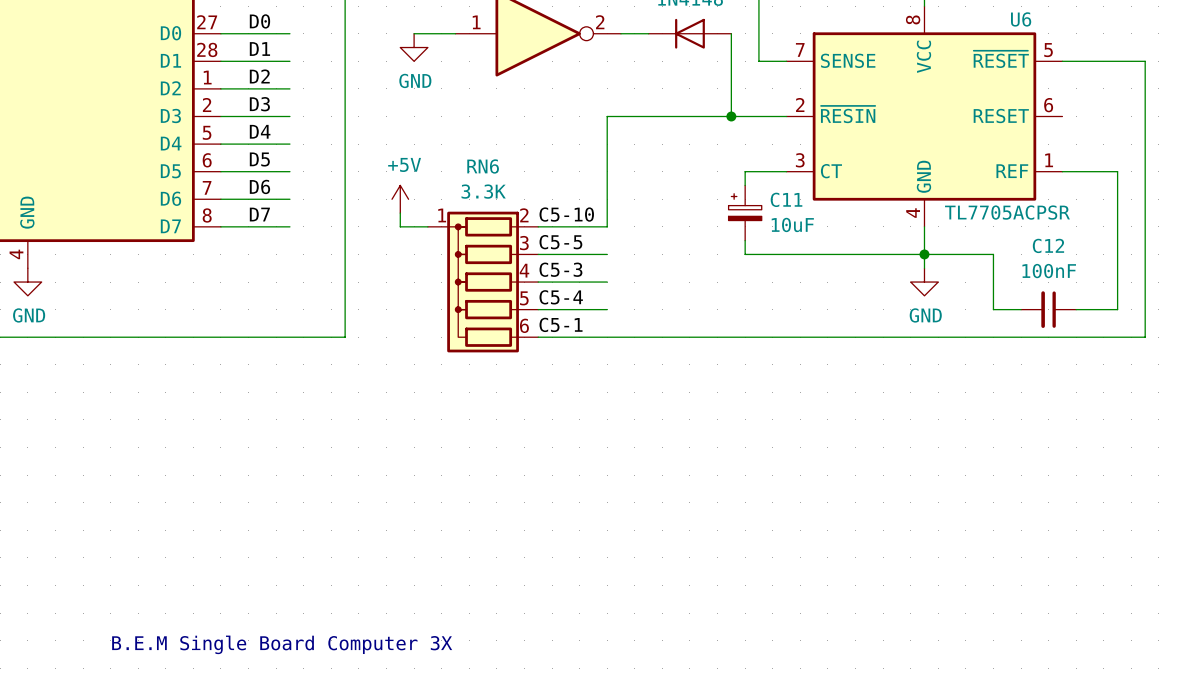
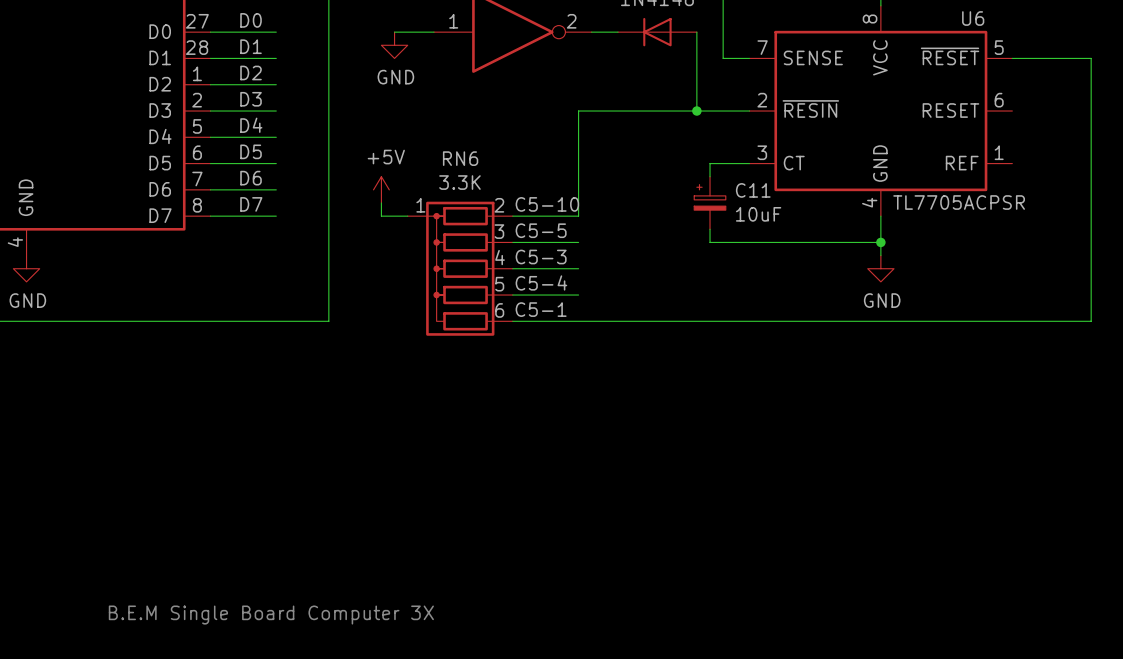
wire: (1062, 171) (1117, 171) (1117, 309) (1076, 309) -> none
wire: (924, 254) (993, 254) (993, 309) (1021, 309) -> none
C12: 100nF (1048, 309) -> none

